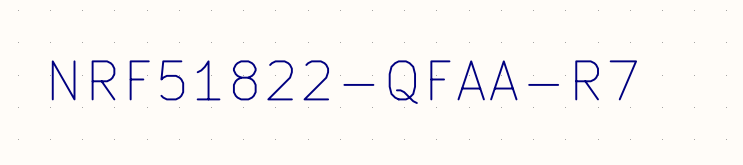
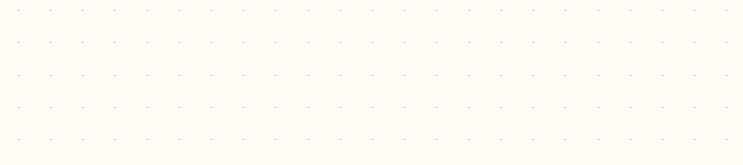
text: NRF51822-QFAA-R7 (344, 82) -> none

